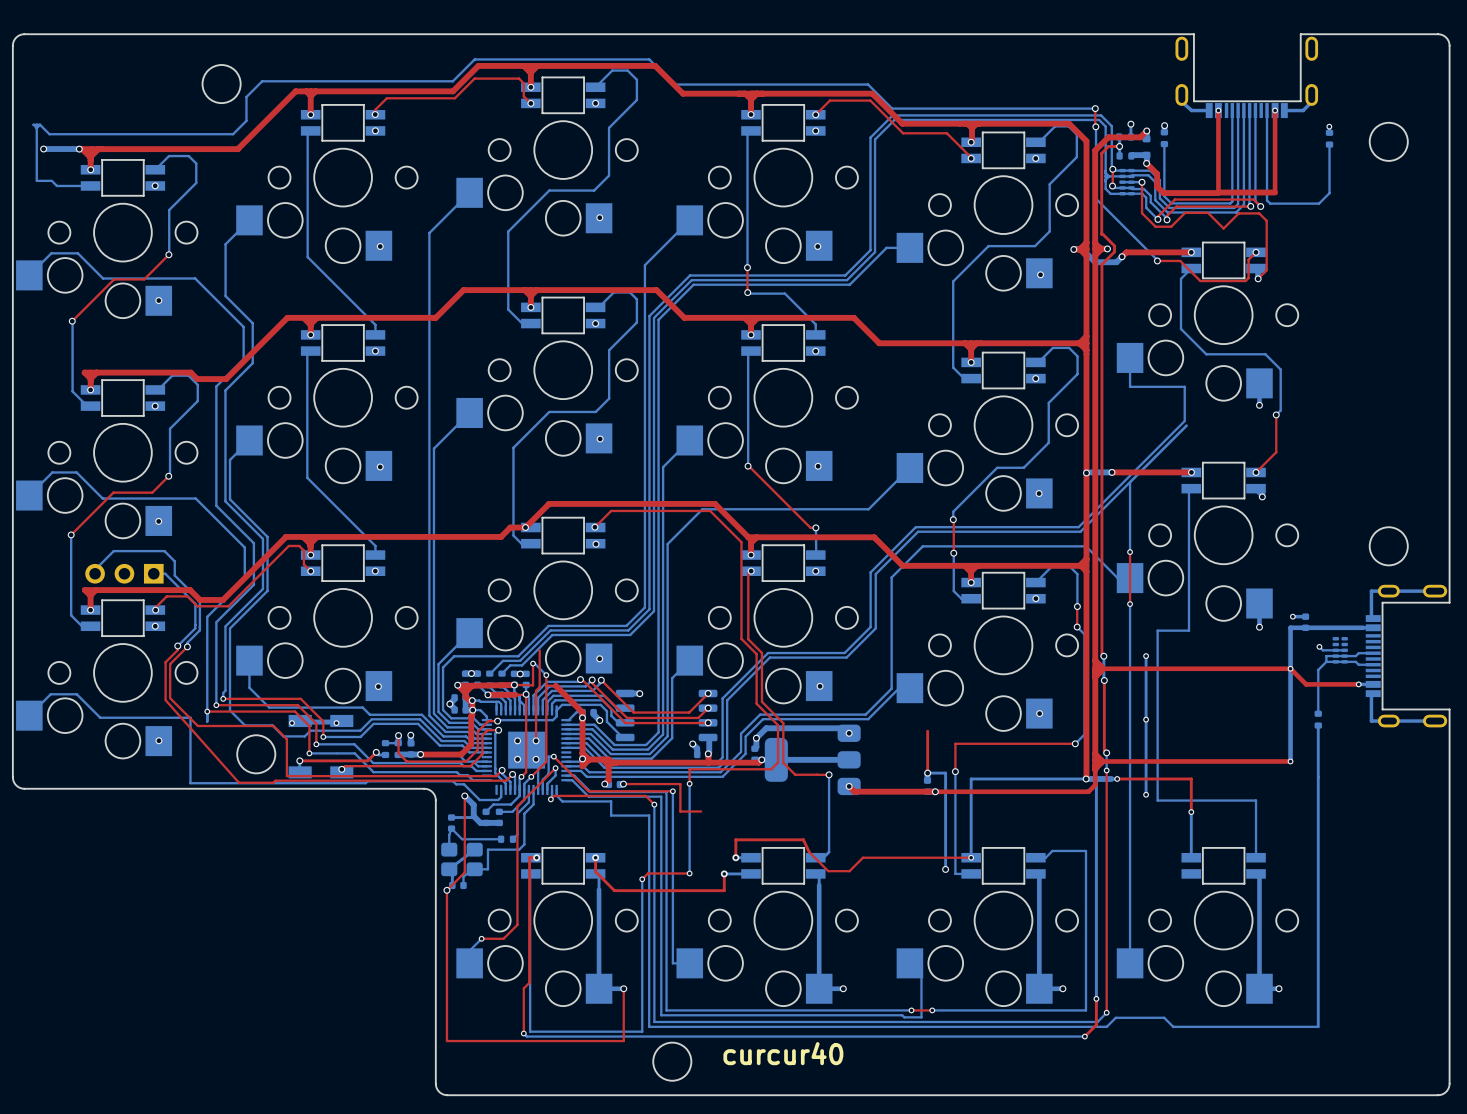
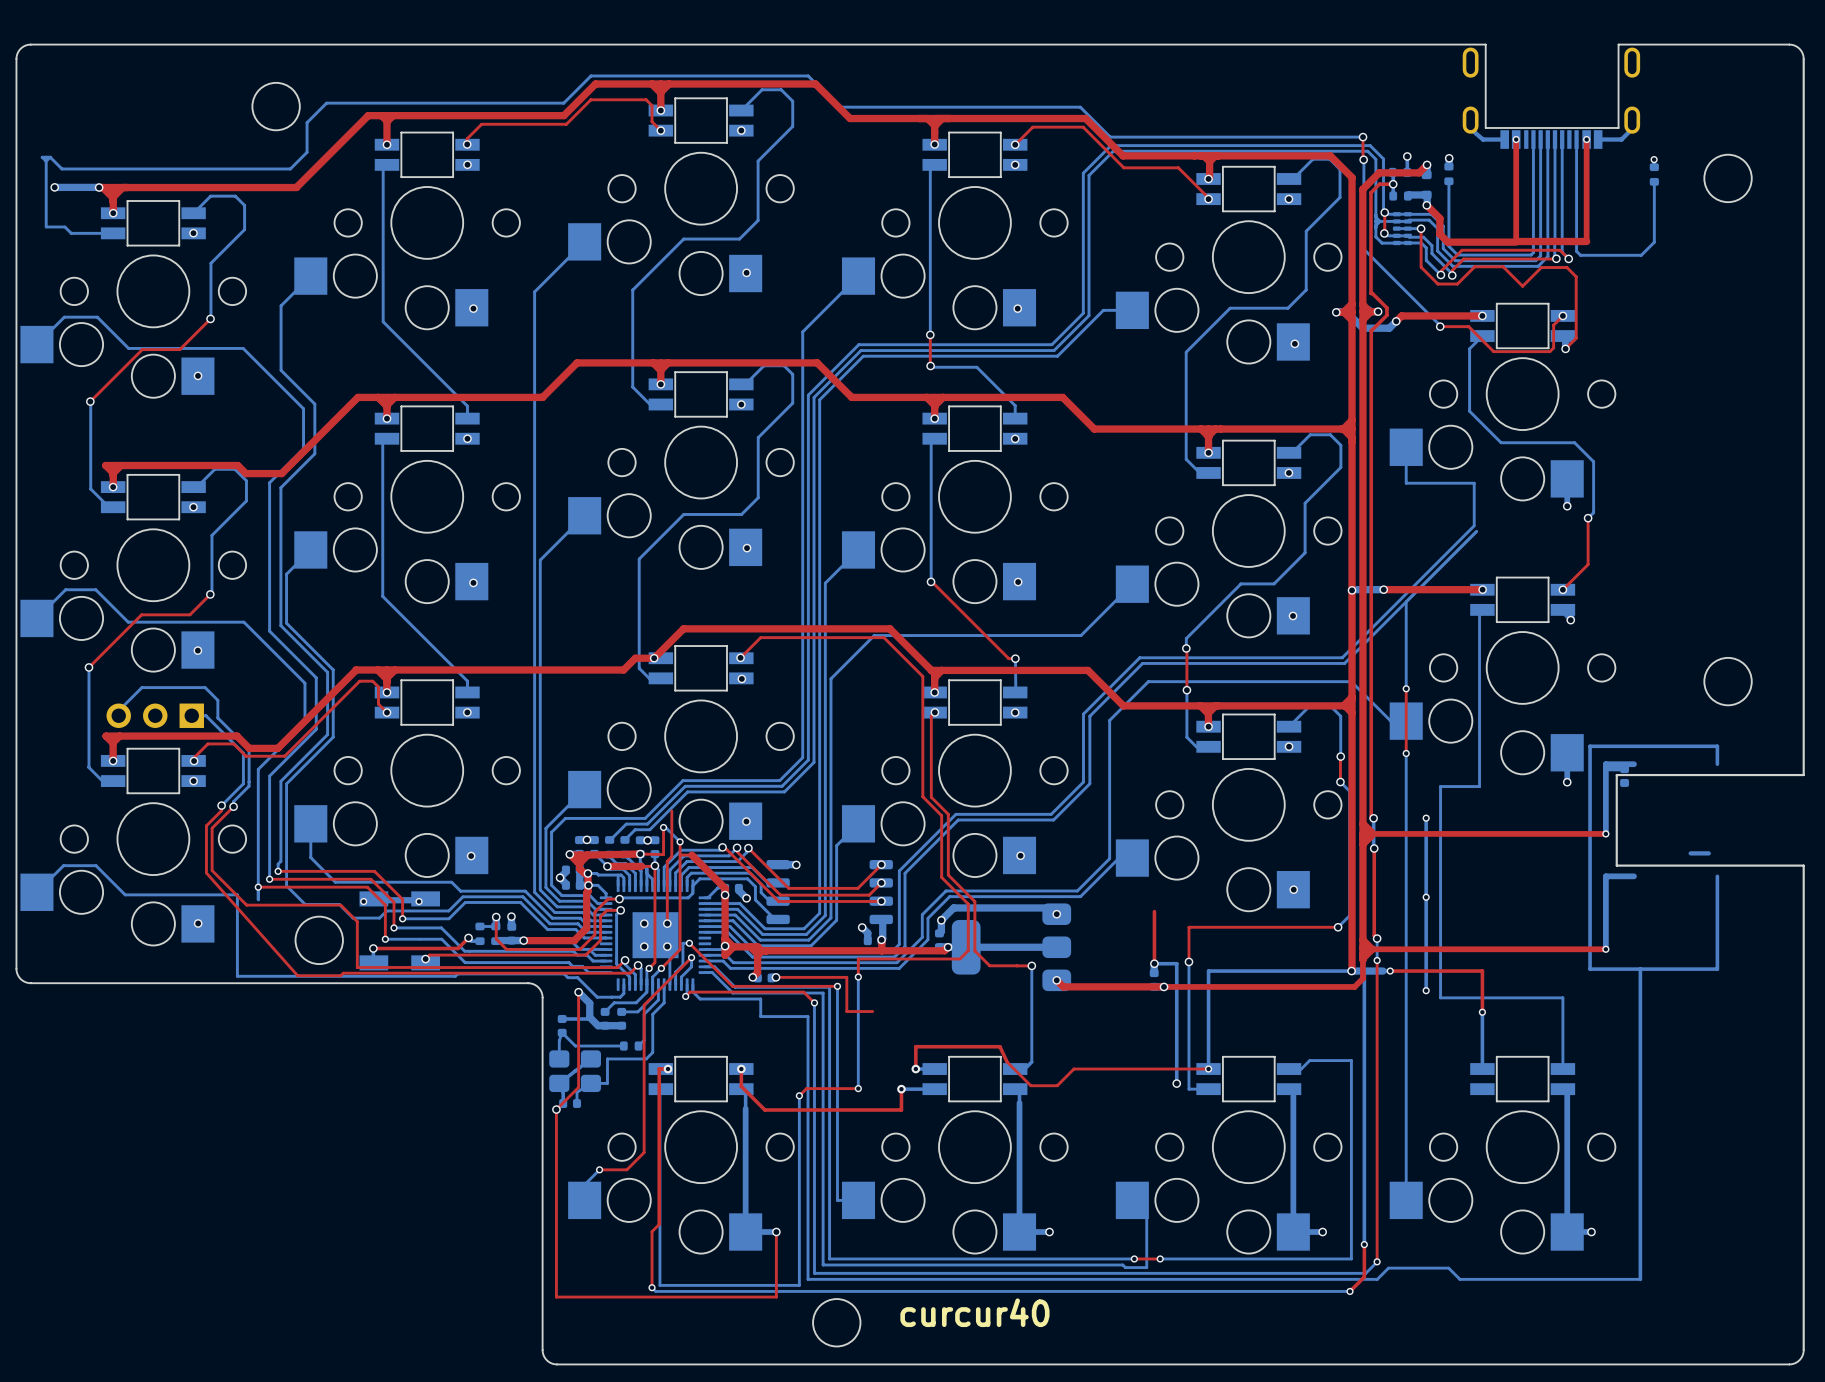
bottom track: (1435, 591) (1371, 591) (1371, 616) (1373, 618) -> none
board edge: (1449, 602) (1382, 602) (1382, 709) (1449, 709) -> (1803, 751) (1803, 775) (1616, 775) (1616, 865) (1803, 865) (1803, 884)
bottom track: none -> (1717, 764) (1717, 746) (1590, 746) (1590, 969) (1717, 969) (1717, 876)
via: (1292, 616) -> none
bottom track: (1290, 627) (1373, 627) -> (1605, 782) (1605, 764) (1634, 764)
bottom track: (1319, 646) (1322, 650) (1344, 650) -> none
via: (1319, 646) -> none
part: (1340, 650) -> none
bottom track: (1373, 653) (1358, 653) (1355, 656) (1326, 656) (1326, 661) -> none
part: (1406, 656) -> none
bottom track: (1326, 661) (1355, 661) (1358, 664) (1373, 664) -> none
bottom track: (1326, 661) (1318, 669) (1318, 713) -> none
bottom track: (1290, 668) (1290, 702) -> (1634, 876) (1605, 876)
top track: (1290, 668) (1306, 684) (1358, 684) -> none
via: (1358, 684) -> none
bottom track: (1373, 693) (1371, 695) (1371, 721) (1435, 721) -> none
part: (1318, 719) -> none
bottom track: (1318, 725) (1318, 777) -> none

